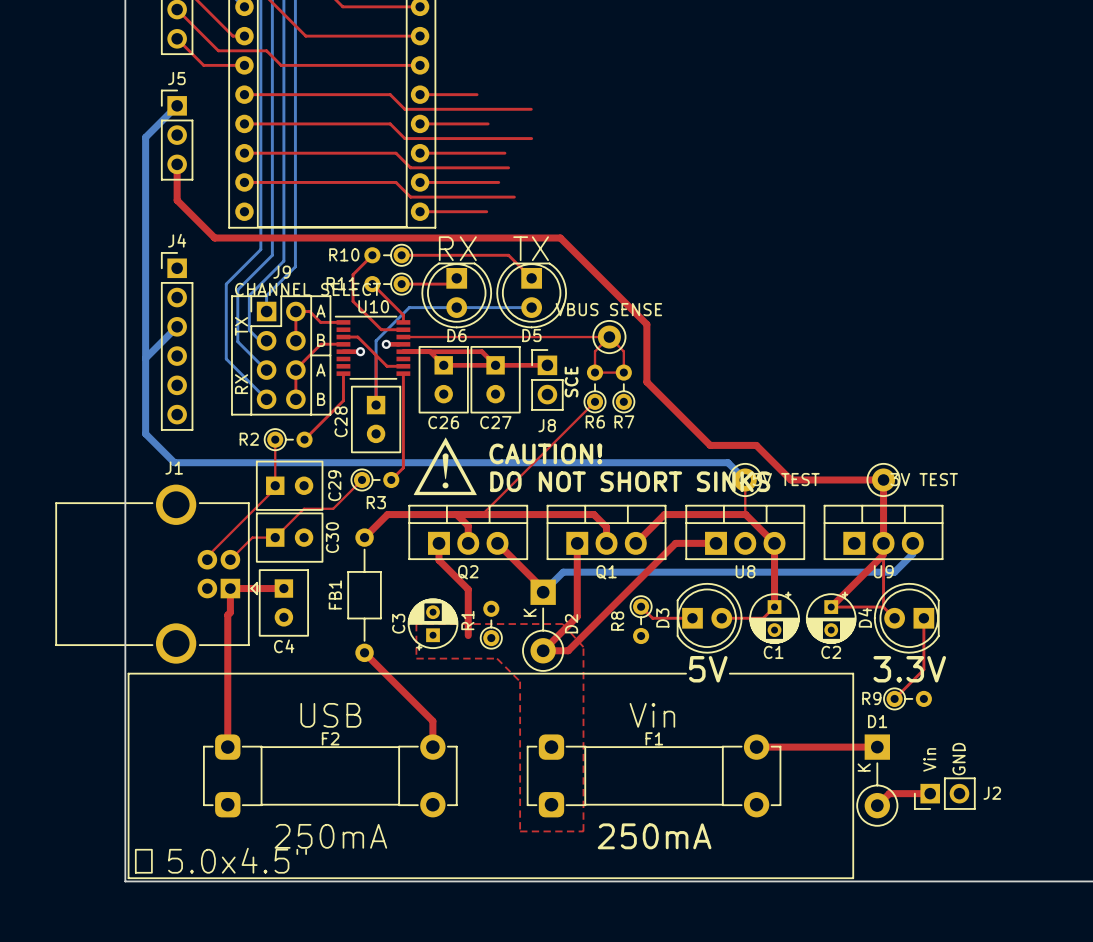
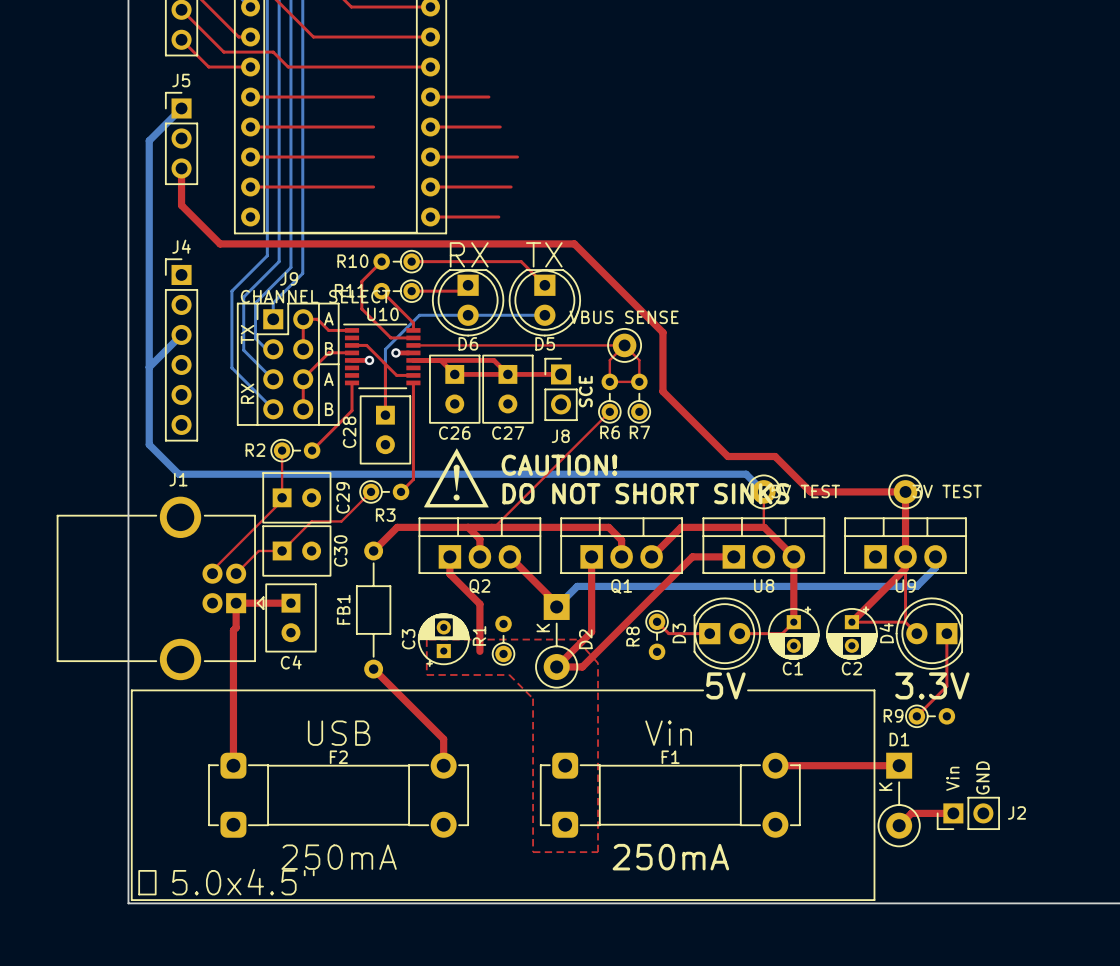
top track: (364, 94) (390, 94) (404, 109) (531, 109) -> none
top track: (364, 123) (390, 123) (404, 138) (531, 138) -> none
top track: (364, 153) (396, 153) (410, 167) (508, 167) -> none
top track: (364, 182) (396, 182) (410, 197) (514, 197) -> none

